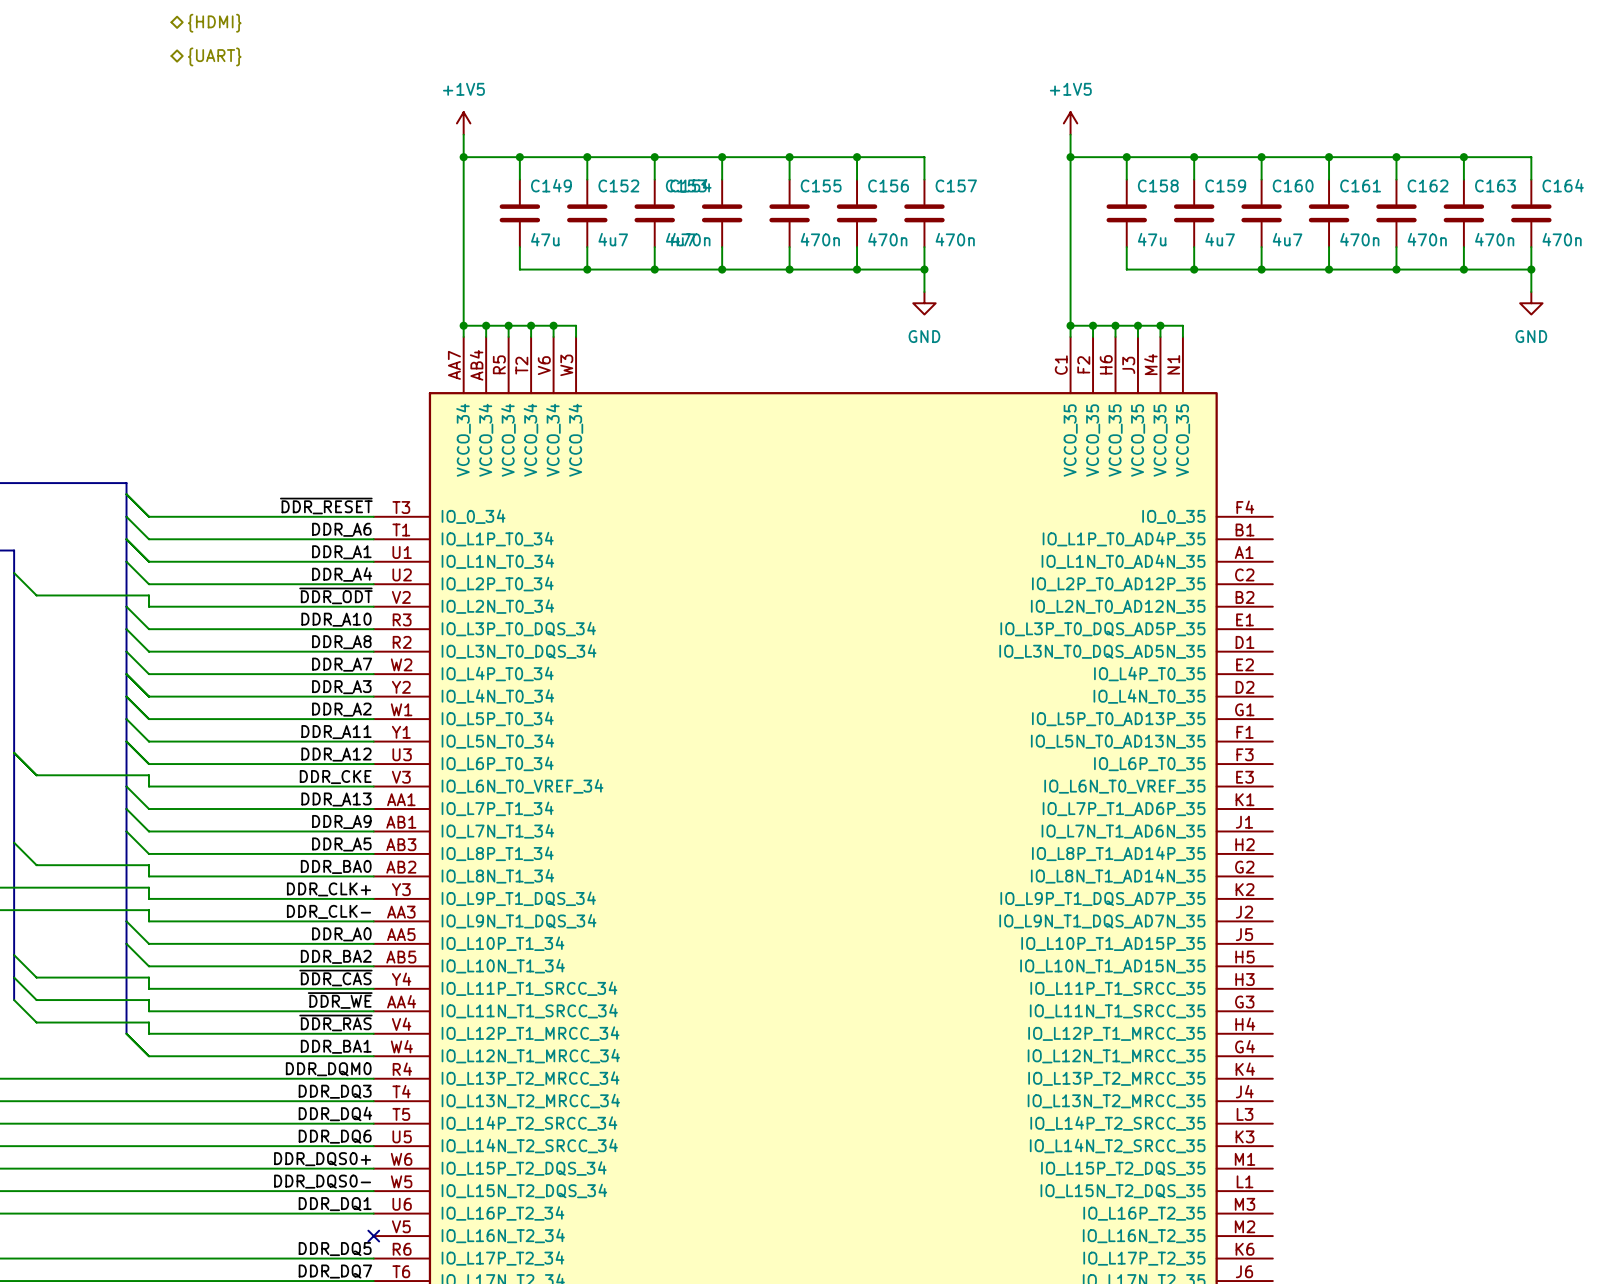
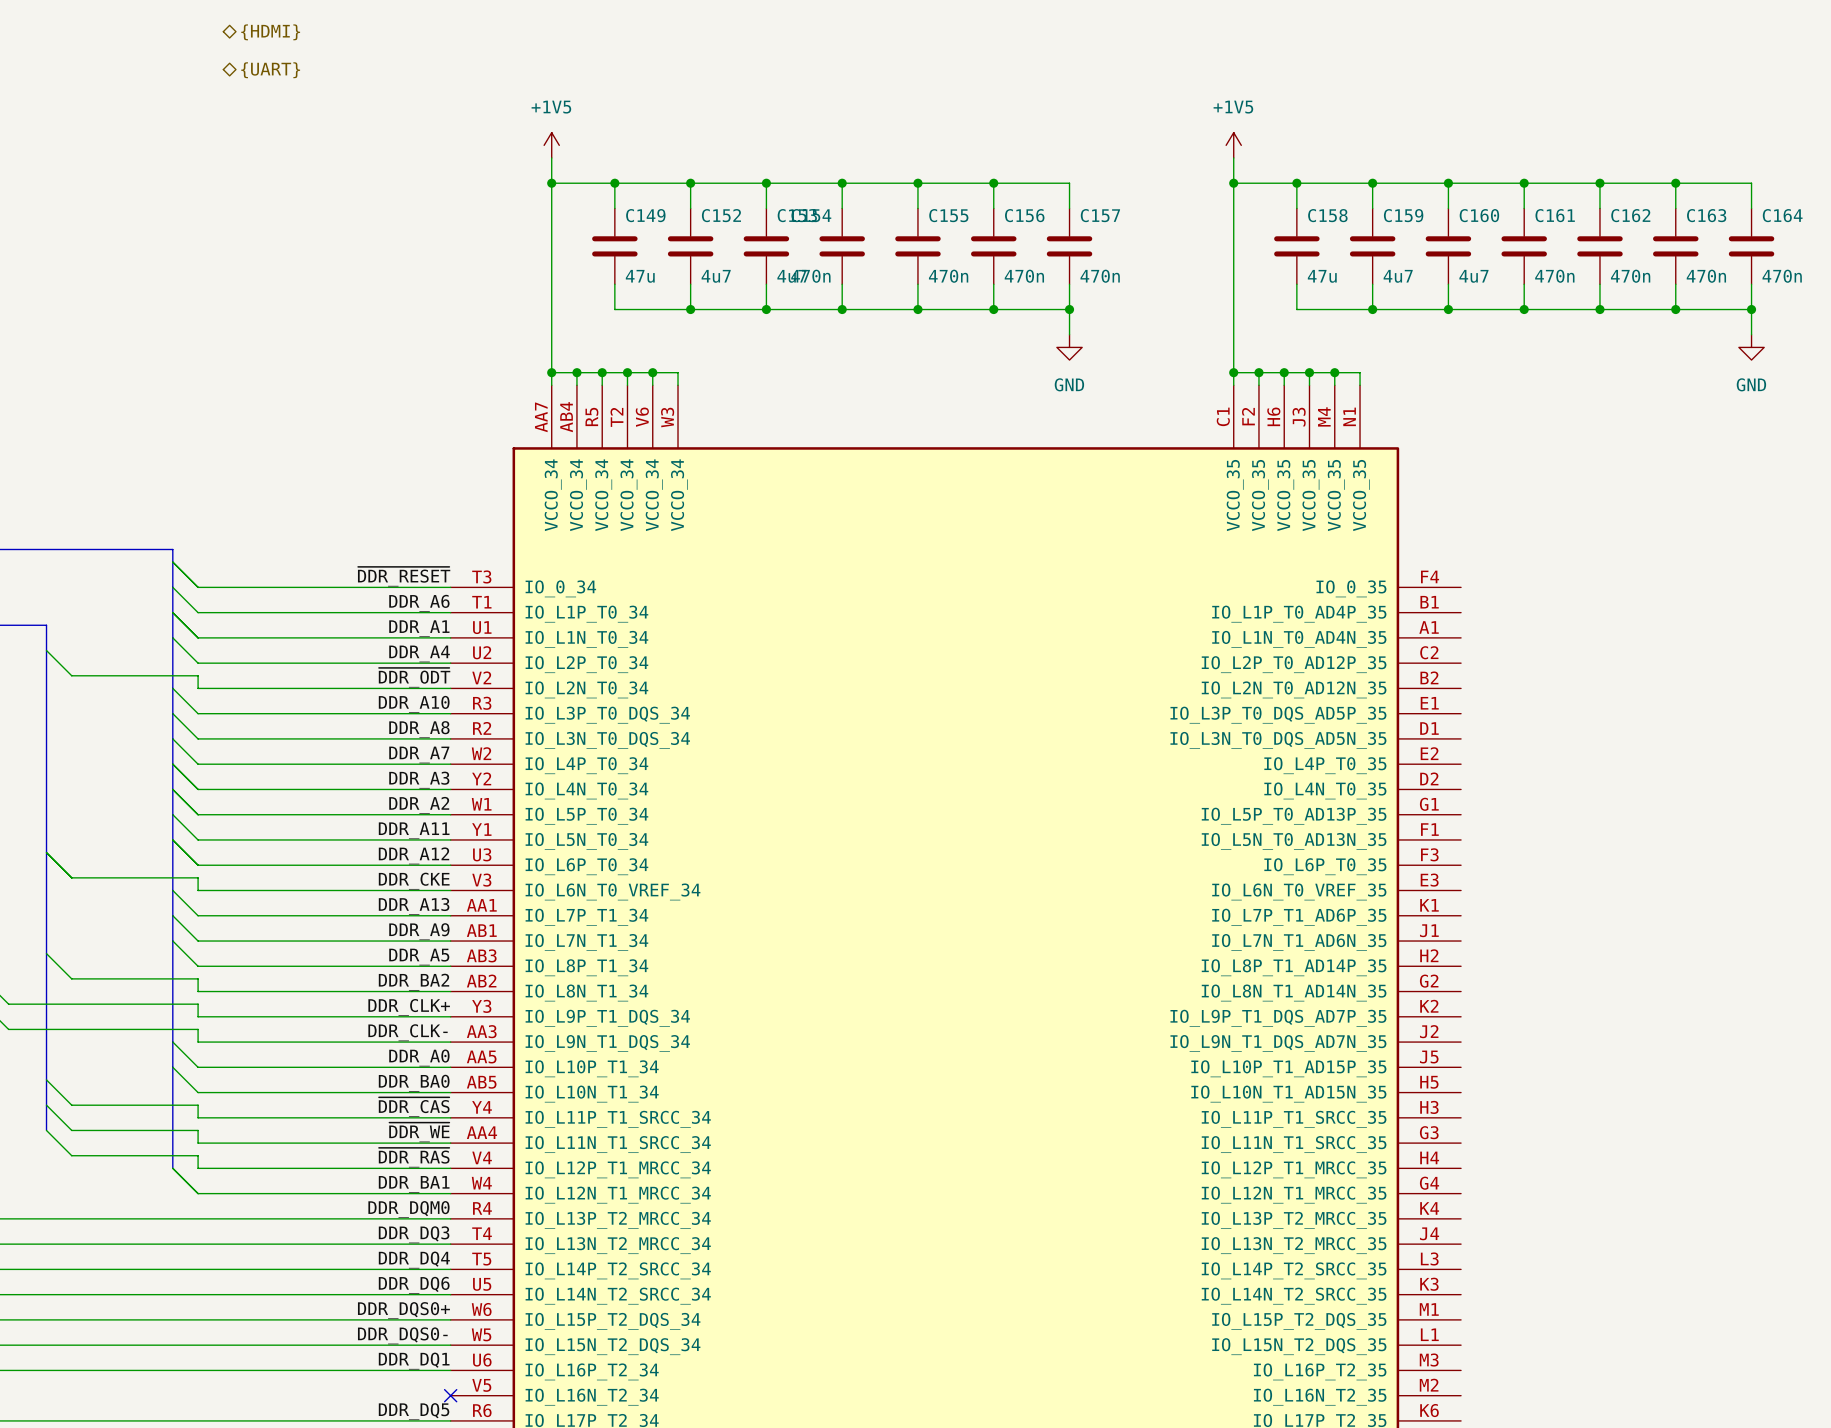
label: DDR_BA0 (336, 866) -> DDR_BA2 (414, 982)
label: DDR_BA2 (336, 956) -> DDR_BA0 (414, 1083)

